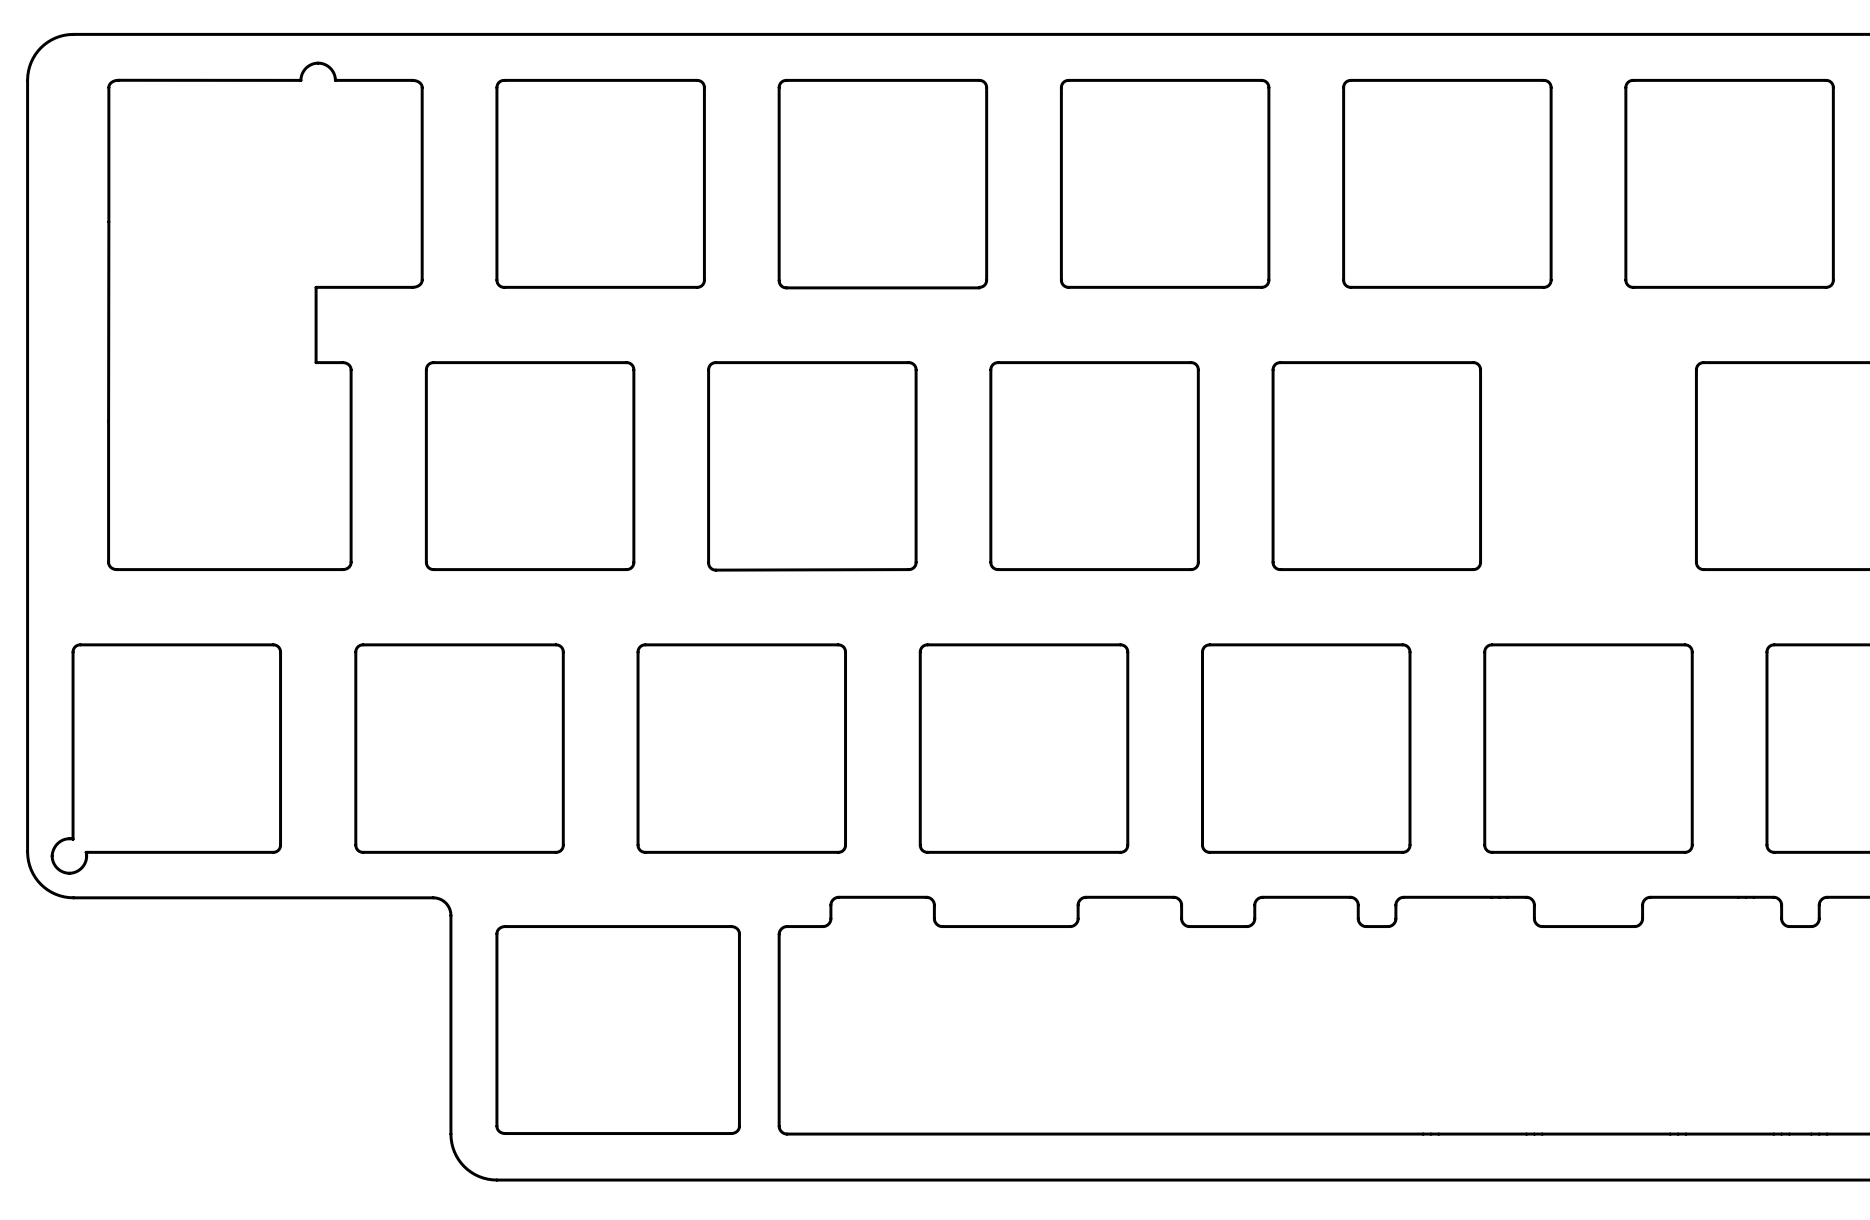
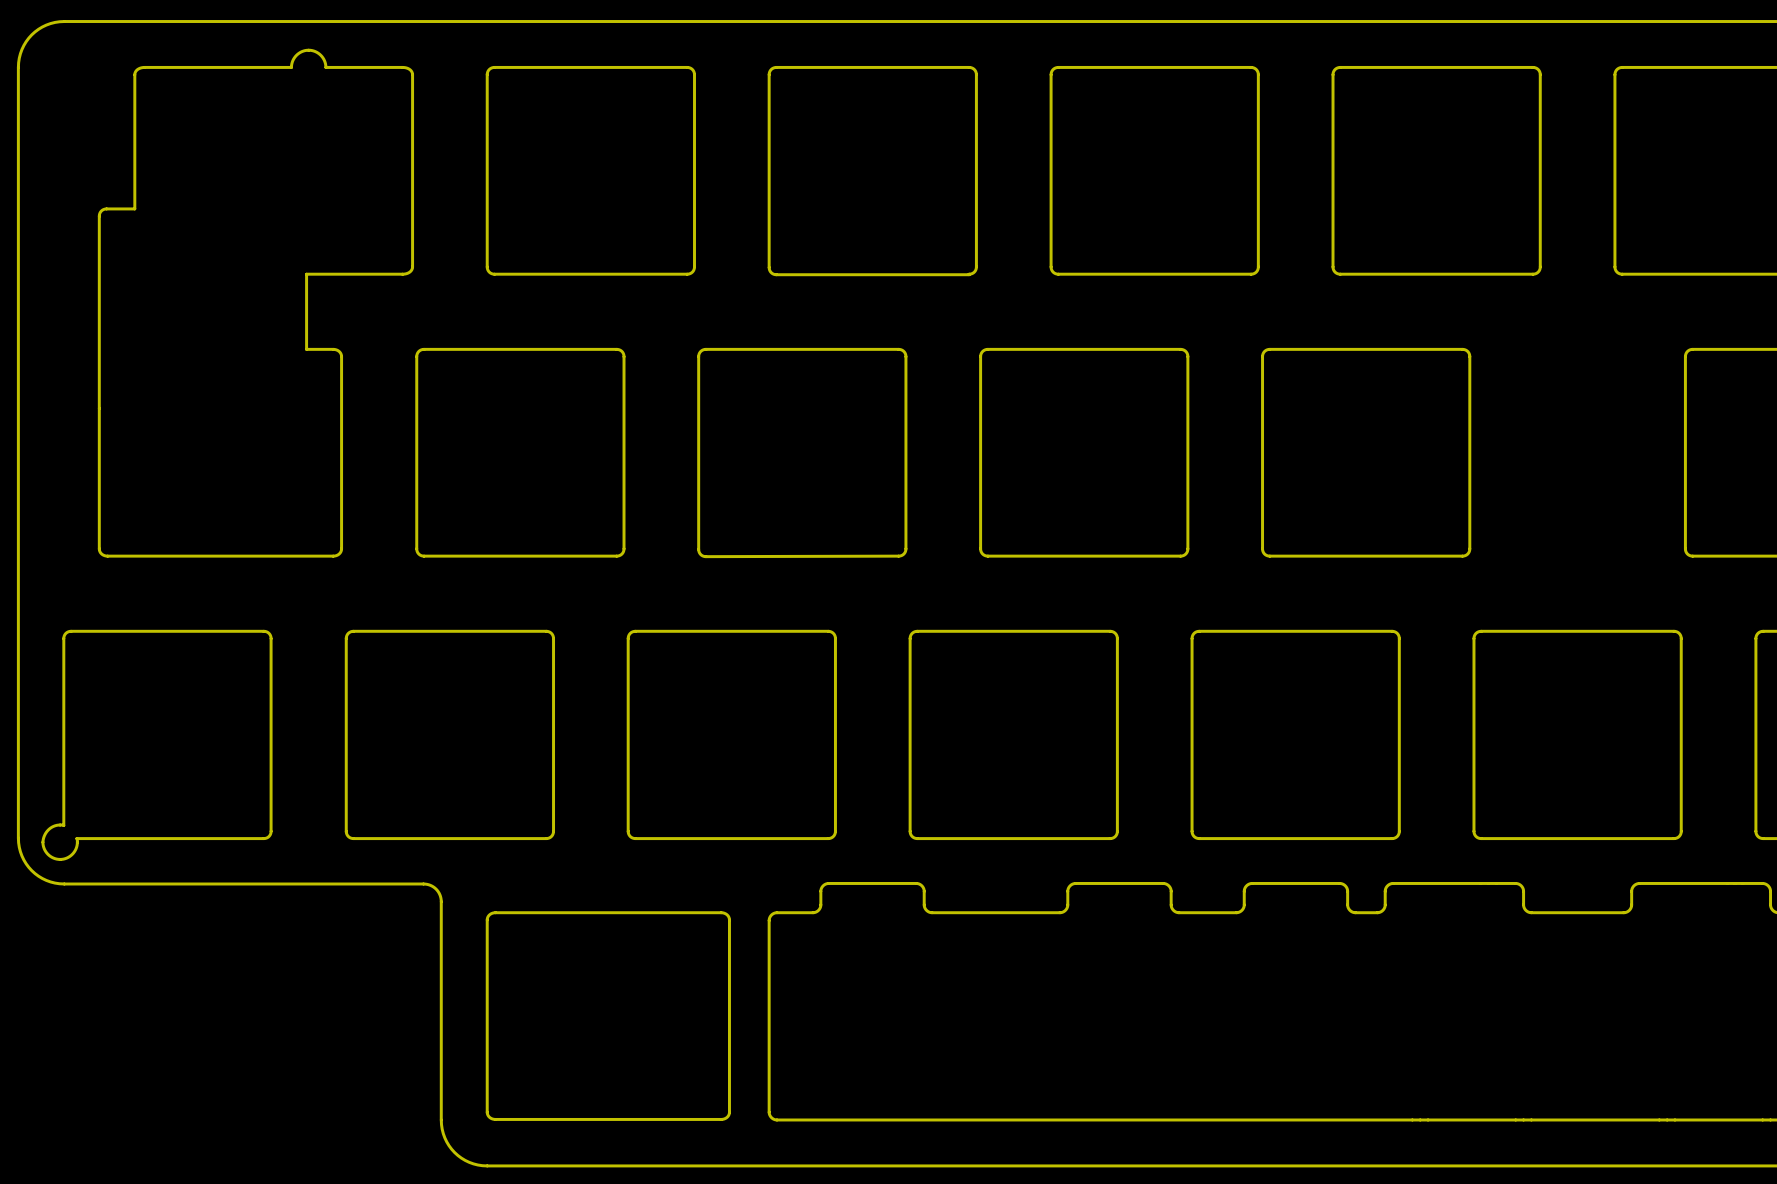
board edge: (300, 80) (118, 80) (109, 84) (108, 421) -> (291, 67) (144, 67) (135, 71) (134, 208) (105, 209) (99, 215) (99, 408)

